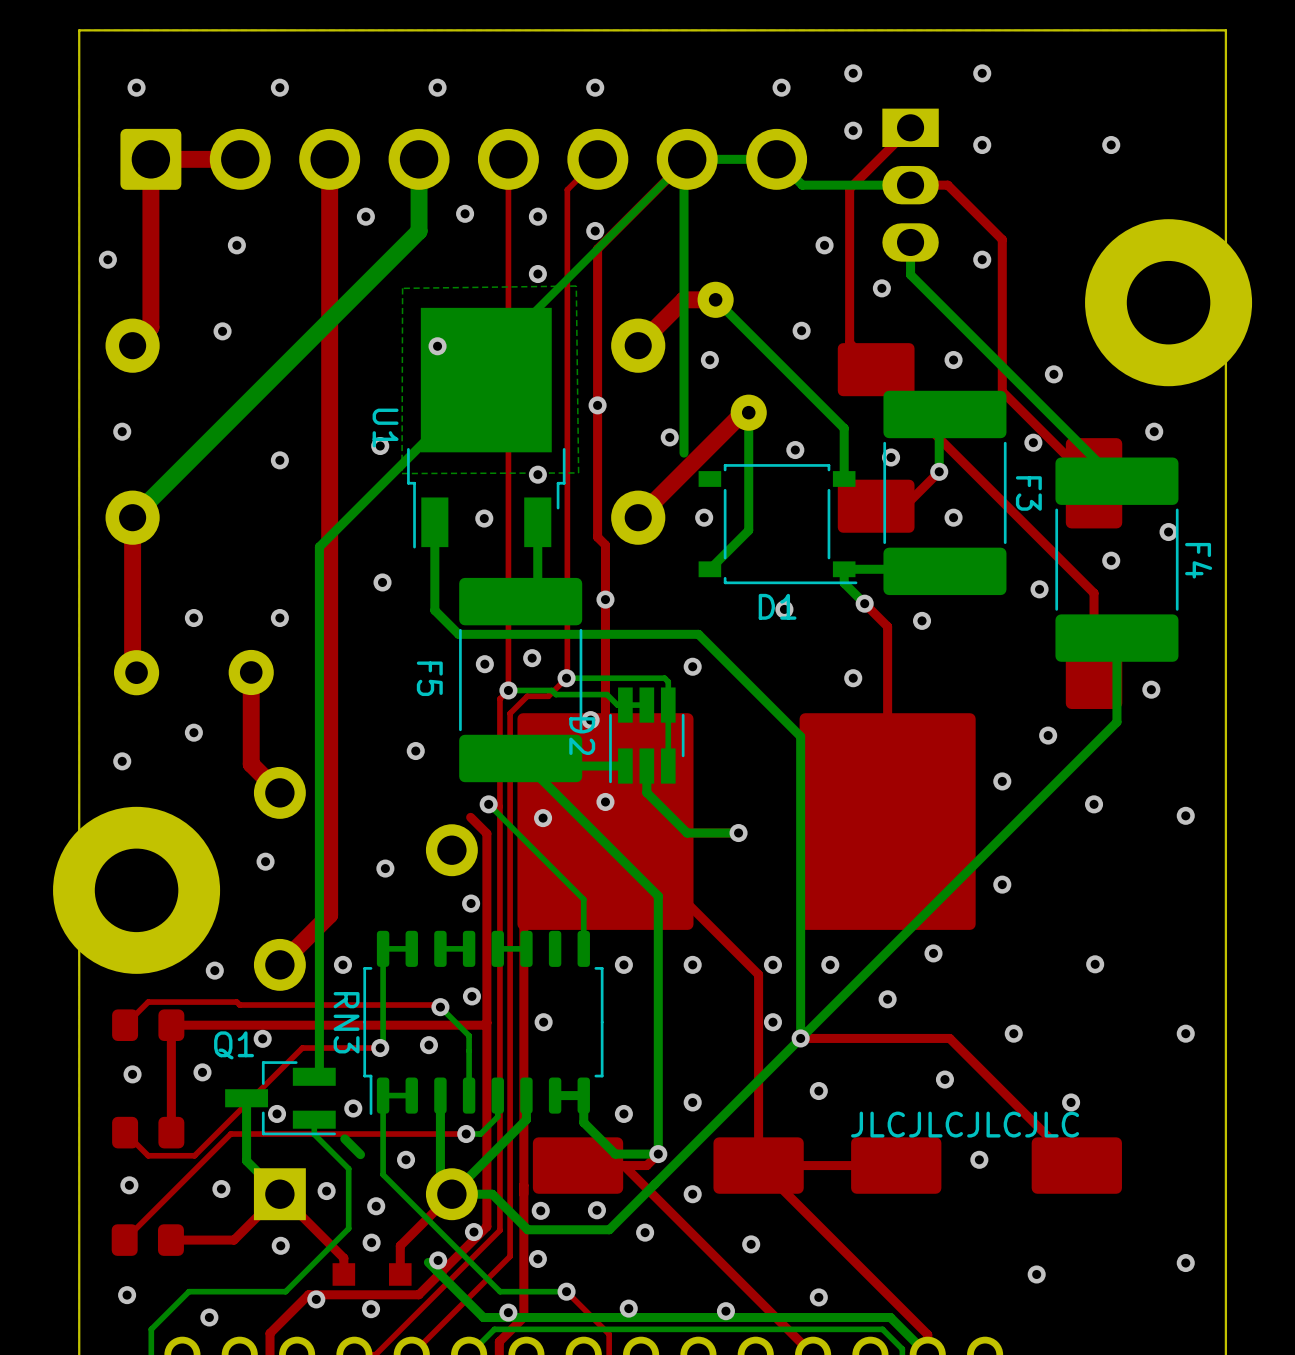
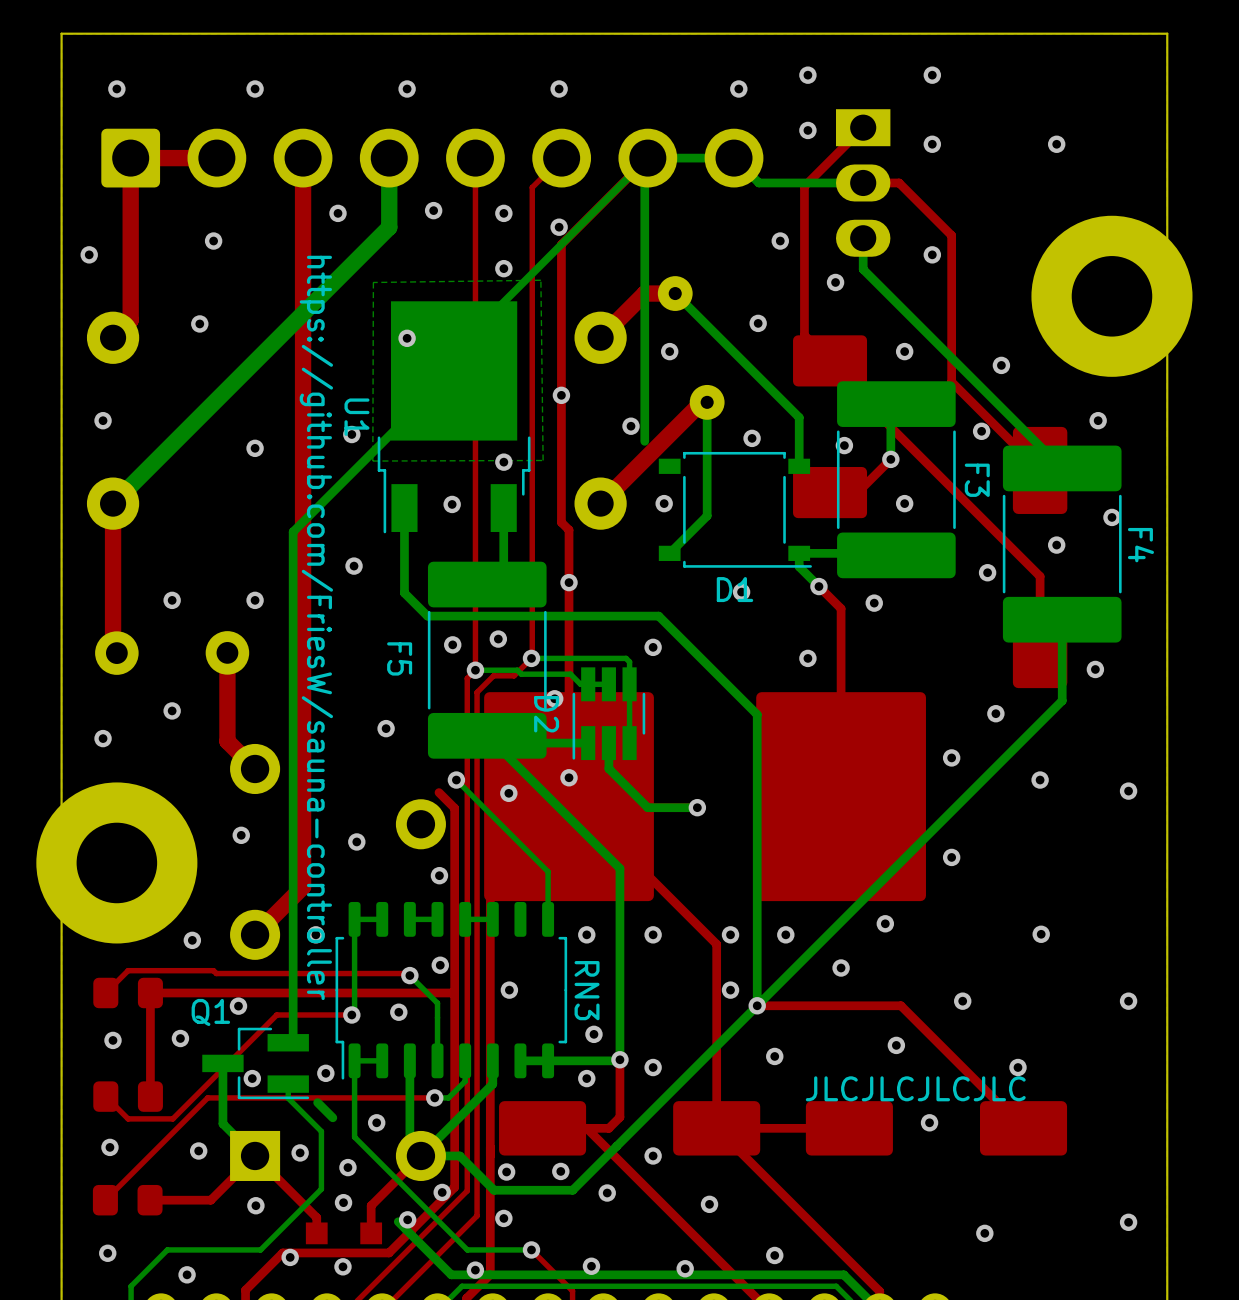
text: none -> https://github.com/FriesW/sauna-controller (316, 627)
RN3 name position: RN3 (346, 1022) -> RN3 (587, 990)
via: none -> (593, 1034)
top track: none -> (619, 1059) (619, 1117)
bottom track: (658, 1094) (658, 1154) (615, 1154) (583, 1122) (583, 1095) -> (619, 1059) (548, 1060)
via: none -> (619, 1059)
via: (658, 1154) -> none

